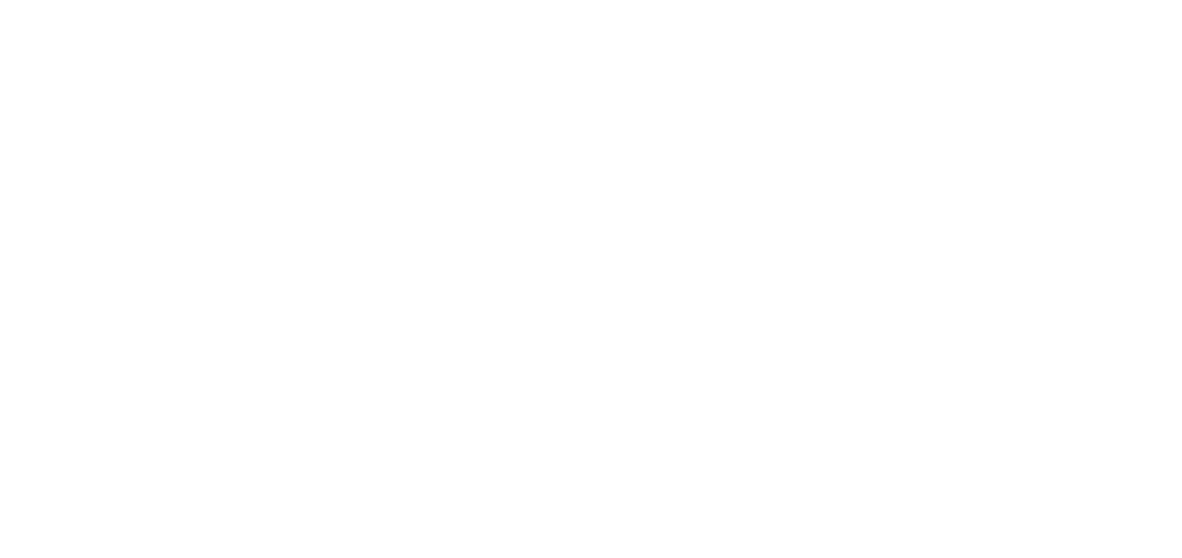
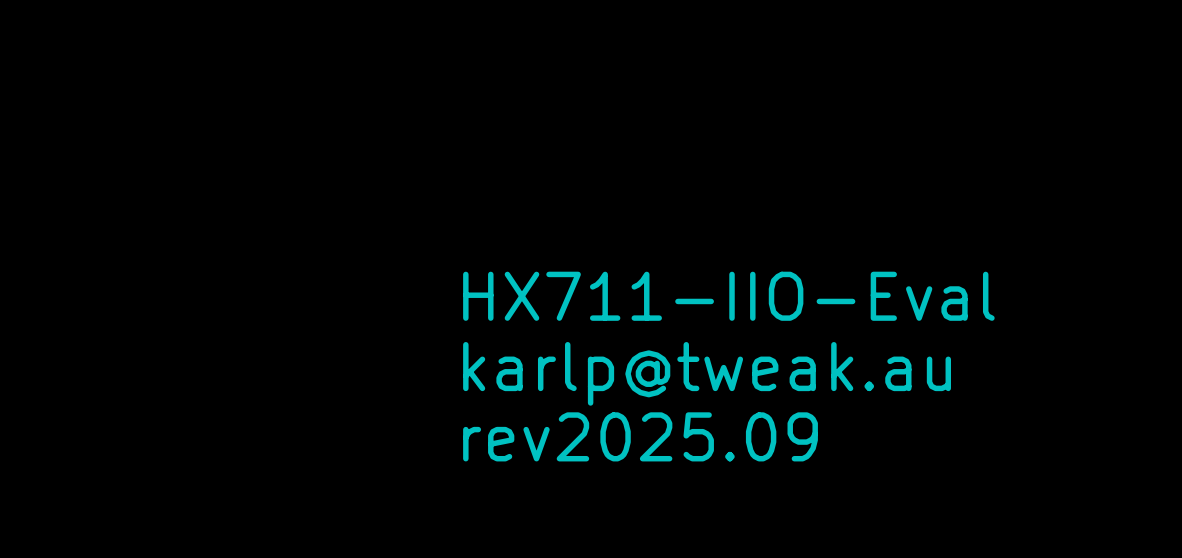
text: none -> HX711-IIO-Eval (728, 296)
text: none -> karlp@tweak.au (707, 373)
text: none -> rev2025.09 (640, 436)

